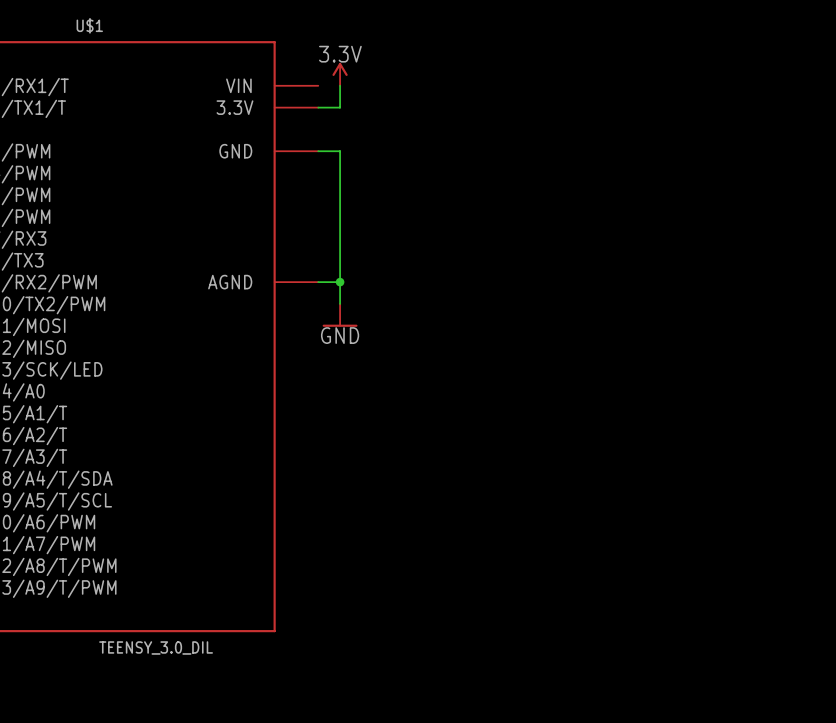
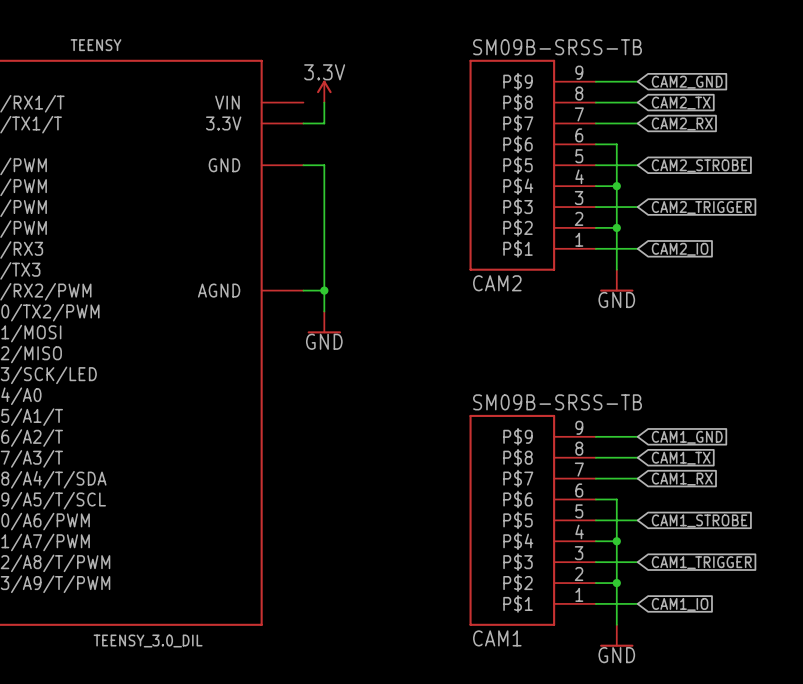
U$1 name: U$1 (89, 25) -> TEENSY (96, 45)
wire: none -> (595, 81) (637, 81)
global label: none -> CAM2_GND (687, 82)
wire: none -> (595, 102) (637, 102)
global label: none -> CAM2_TX (681, 103)
wire: none -> (595, 123) (637, 123)
global label: none -> CAM2_RX (682, 123)
wire: none -> (595, 144) (616, 144) (616, 269)
CAM2: none -> SM09B-SRSS-TB (532, 165)
wire: none -> (595, 165) (637, 165)
global label: none -> CAM2_STROBE (699, 165)
wire: none -> (595, 186) (616, 186)
junction: none -> (616, 186)
wire: none -> (595, 207) (637, 207)
global label: none -> CAM2_TRIGGER (701, 207)
wire: none -> (595, 227) (616, 227)
junction: none -> (616, 227)
wire: none -> (595, 248) (637, 248)
global label: none -> CAM2_IO (680, 249)
power symbol: none -> GND (616, 280)
wire: none -> (595, 436) (637, 436)
global label: none -> CAM1_GND (687, 437)
wire: none -> (595, 457) (637, 457)
global label: none -> CAM1_TX (681, 458)
wire: none -> (595, 478) (637, 478)
global label: none -> CAM1_RX (682, 479)
wire: none -> (595, 499) (616, 499) (616, 624)
CAM1: none -> SM09B-SRSS-TB (532, 520)
wire: none -> (595, 520) (637, 520)
global label: none -> CAM1_STROBE (699, 520)
wire: none -> (595, 541) (616, 541)
junction: none -> (616, 541)
wire: none -> (595, 562) (637, 562)
global label: none -> CAM1_TRIGGER (701, 562)
wire: none -> (595, 583) (616, 583)
junction: none -> (616, 583)
wire: none -> (595, 603) (637, 603)
global label: none -> CAM1_IO (680, 604)
power symbol: none -> GND (616, 635)

